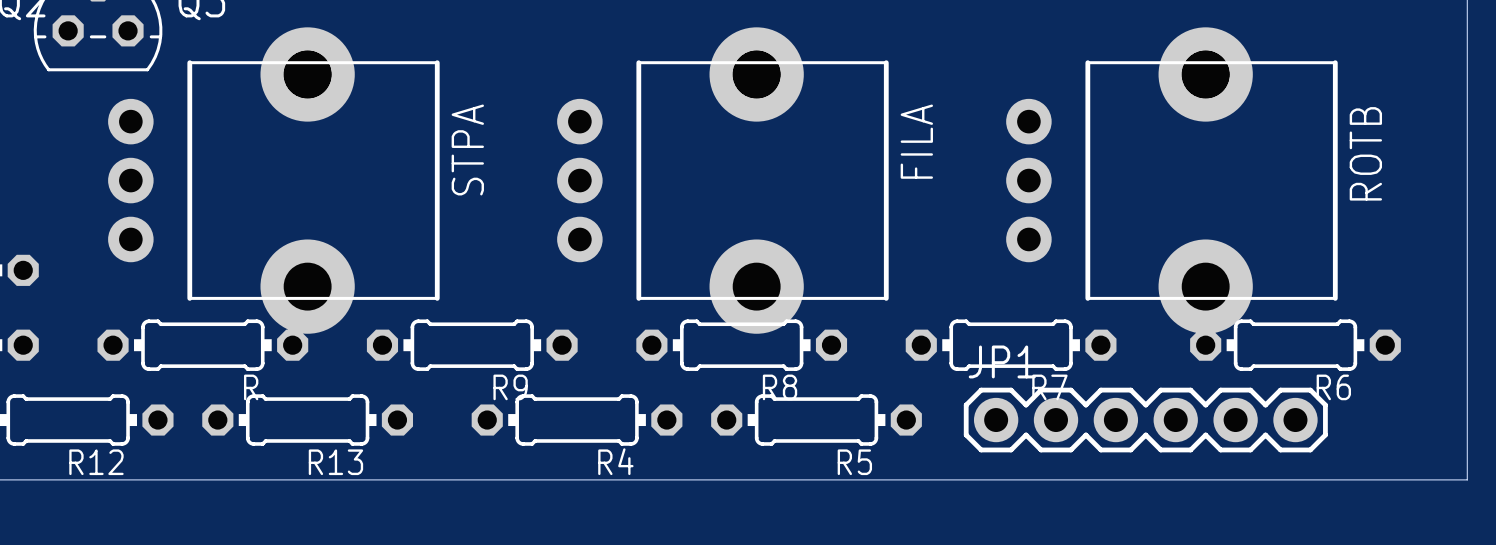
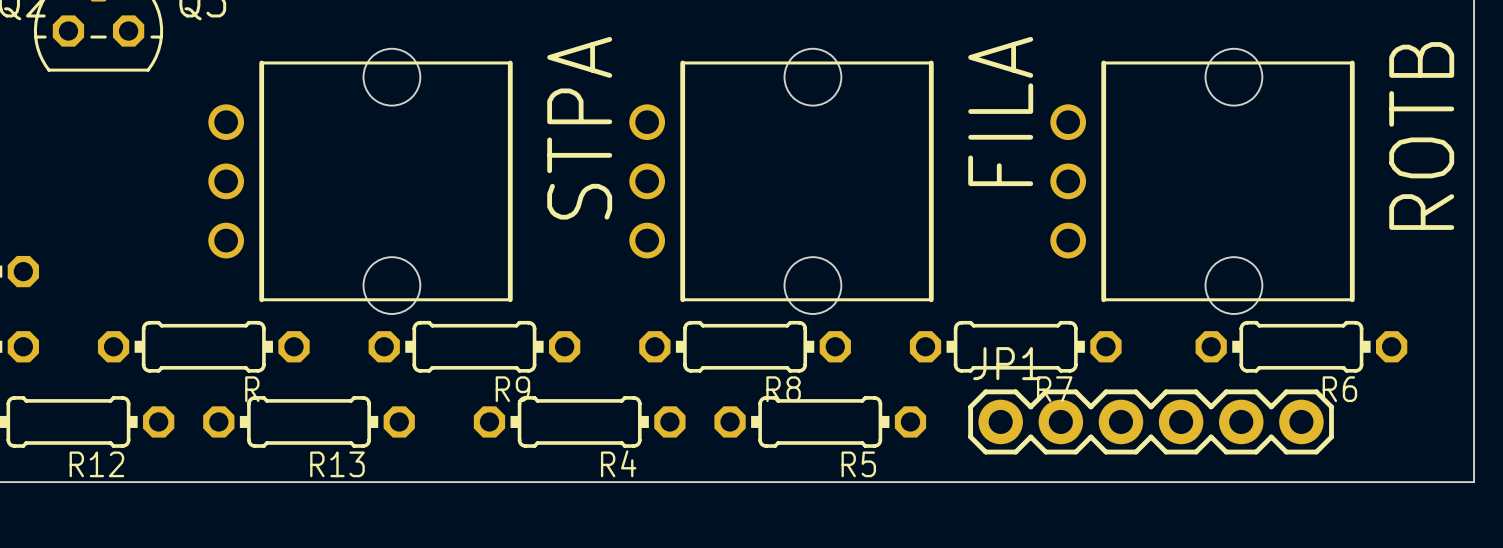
STPA: (273, 180) -> none
STPA: none -> (360, 181)
FILA: (722, 180) -> none
FILA: none -> (781, 181)
ROTB: (1171, 180) -> none
ROTB: none -> (1202, 181)

